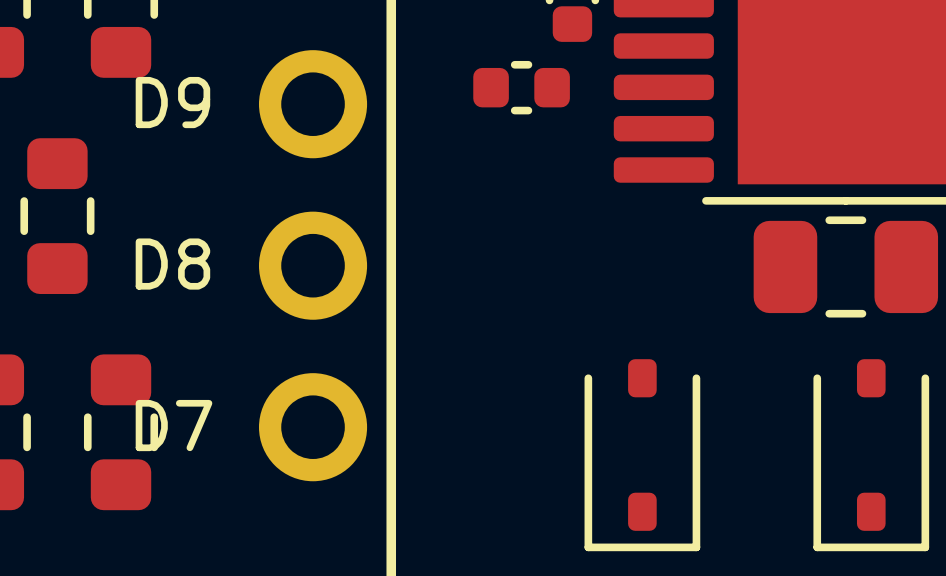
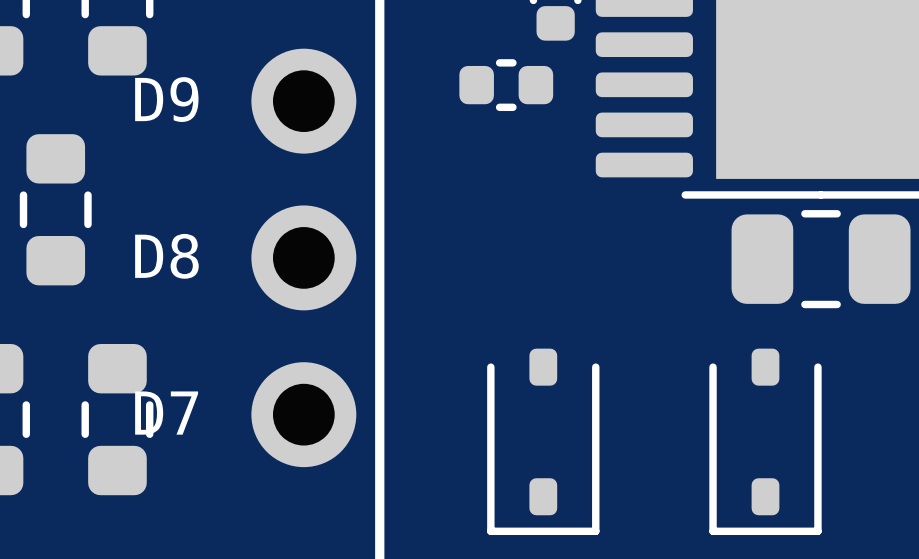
part: none -> (543, 441)
part: (642, 455) -> none
part: none -> (765, 441)
part: (871, 455) -> none

